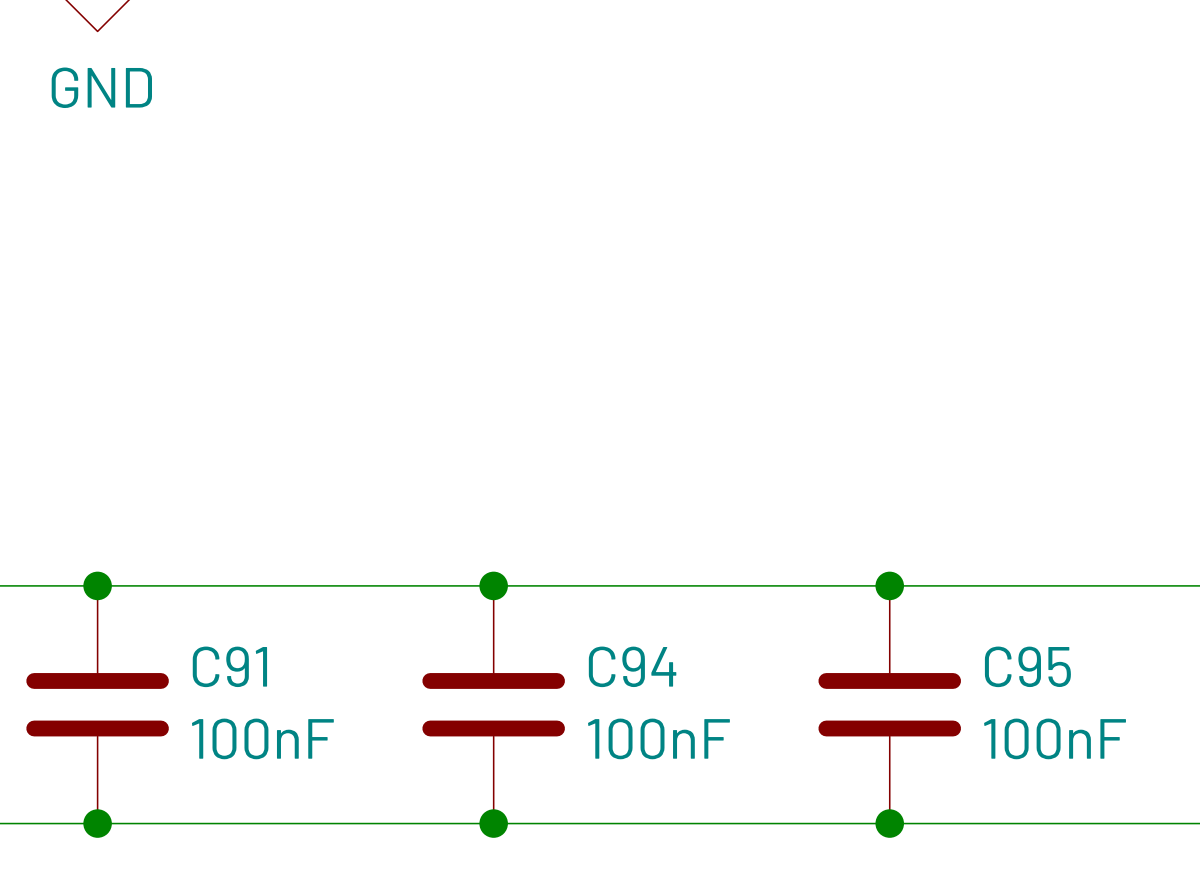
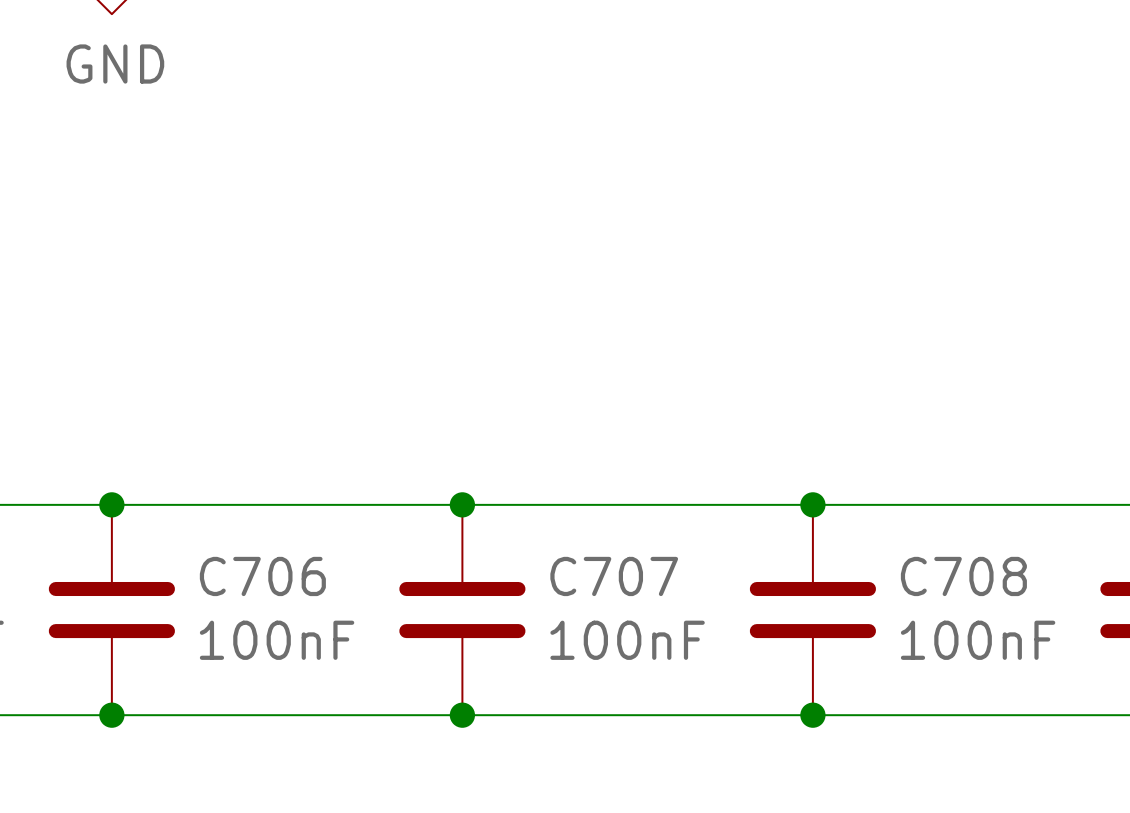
C91 name: C91 (229, 666) -> C706 (262, 576)
C94 name: C94 (632, 666) -> C707 (614, 576)
C95 name: C95 (1027, 666) -> C708 (963, 576)

